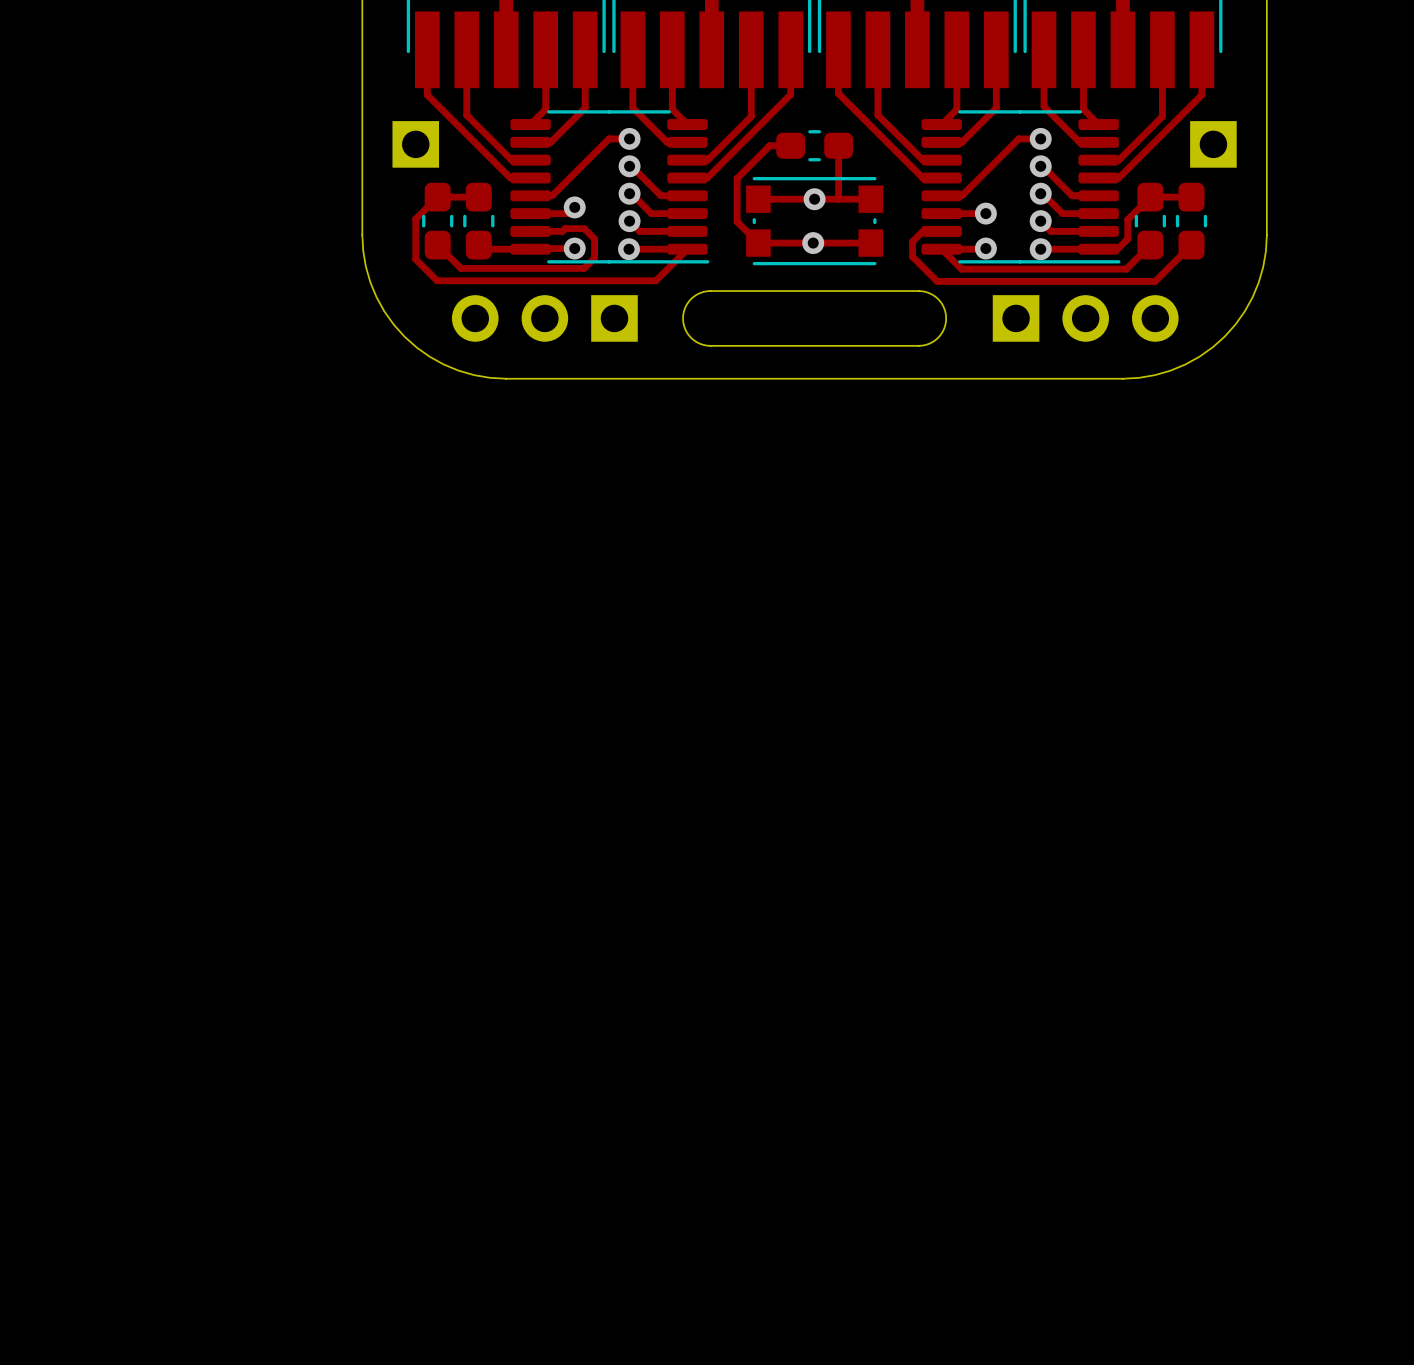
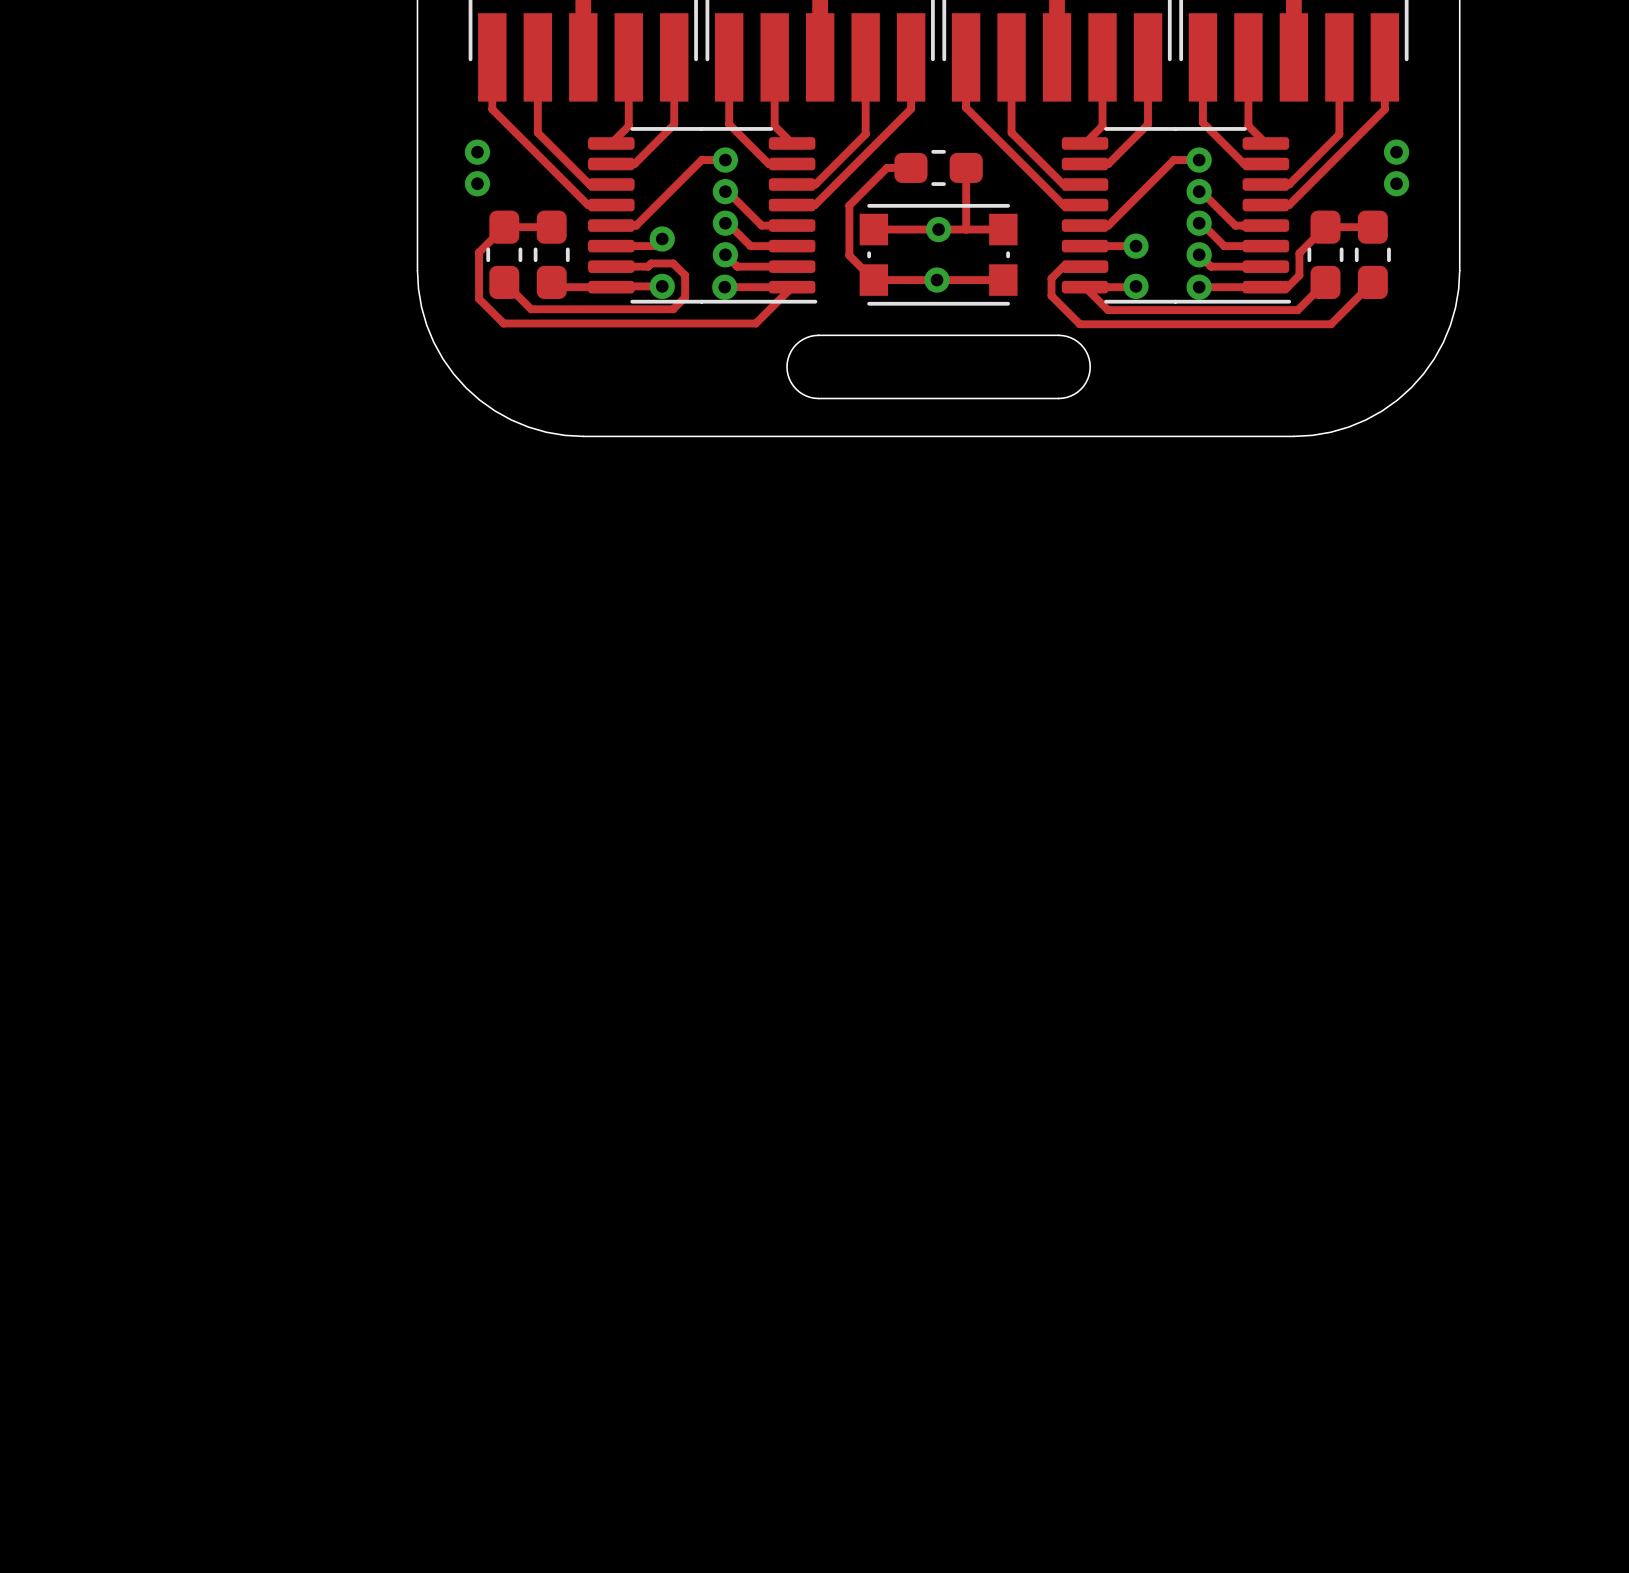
via: none -> (477, 152)
via: none -> (1396, 152)
part: (415, 144) -> none
part: (1213, 144) -> none
via: none -> (477, 183)
via: none -> (1396, 183)
part: (544, 318) -> none
part: (1085, 318) -> none

